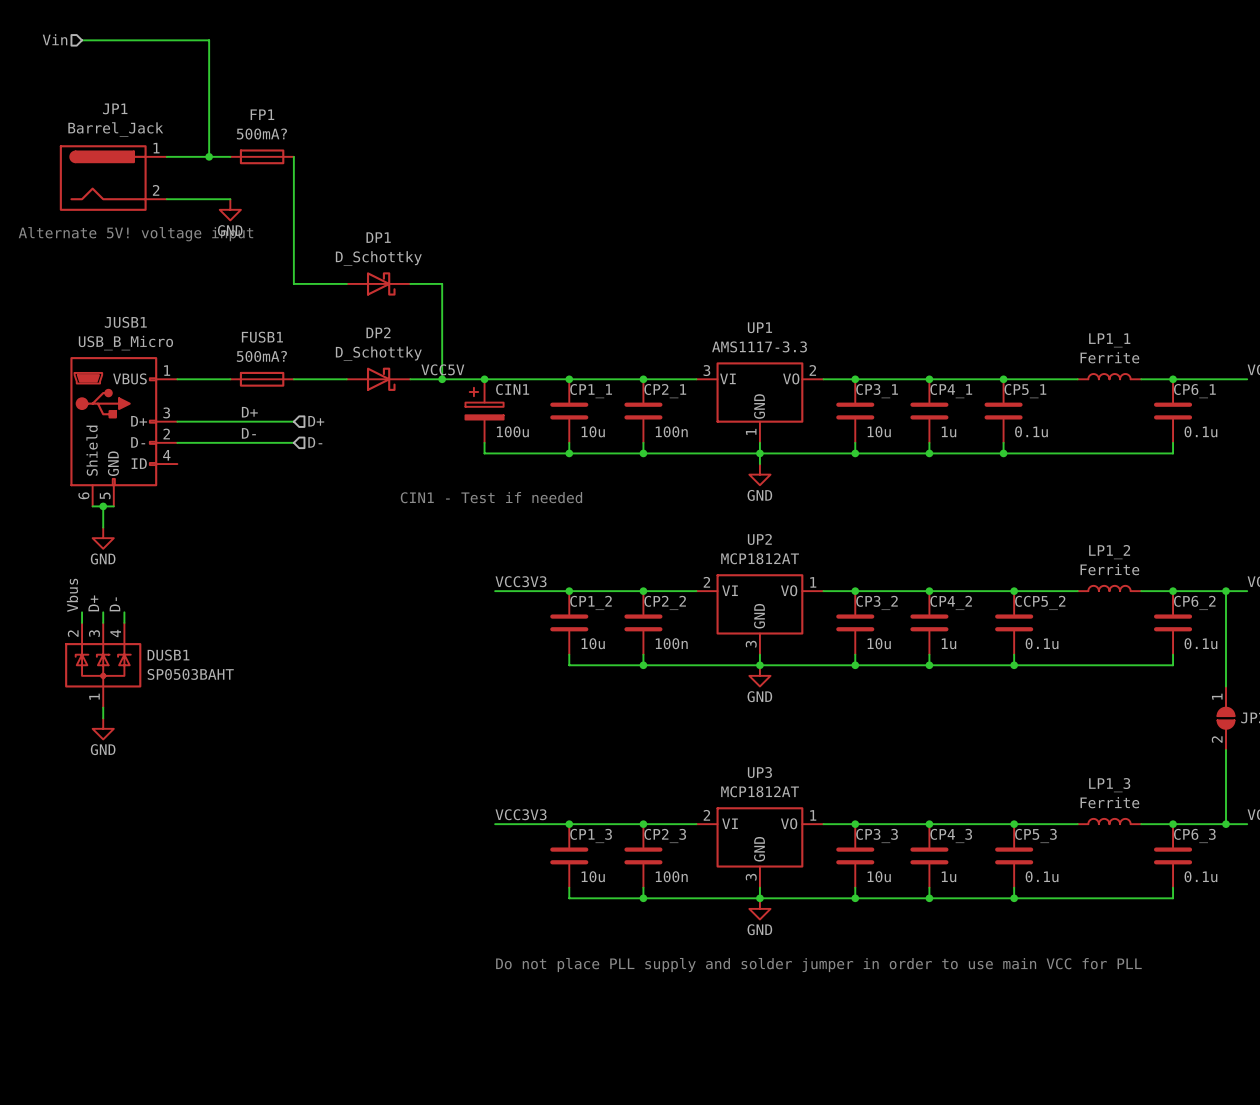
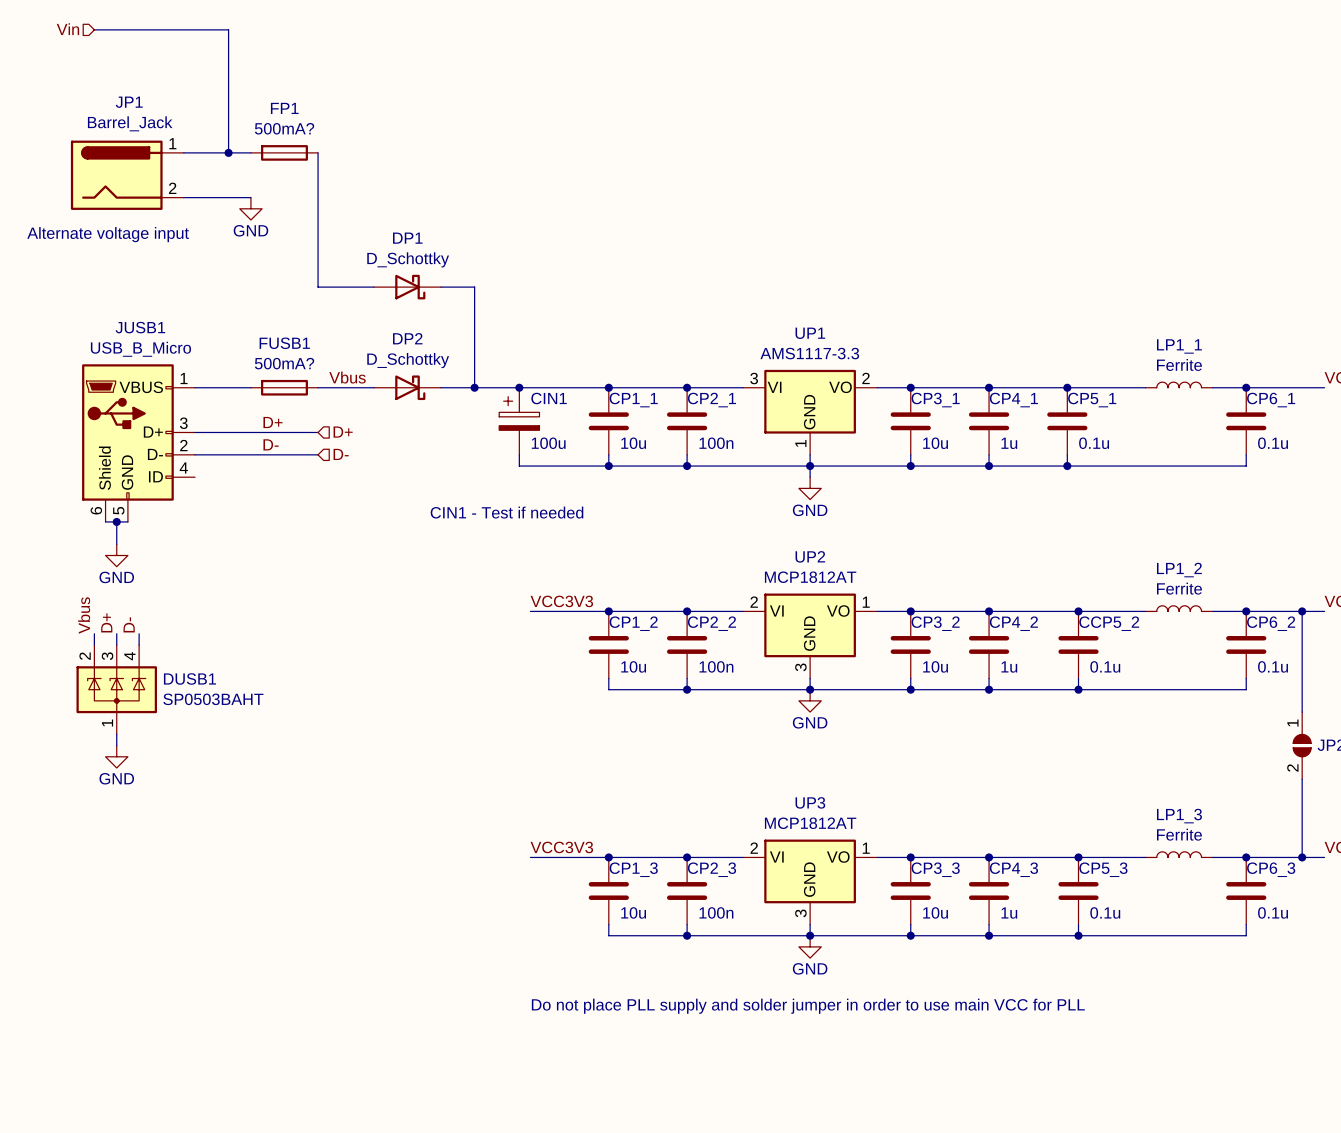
text: Alternate 5V! voltage input (135, 234) -> Alternate voltage input (108, 234)
label: none -> Vbus (347, 377)
label: VCC5V (442, 369) -> none

